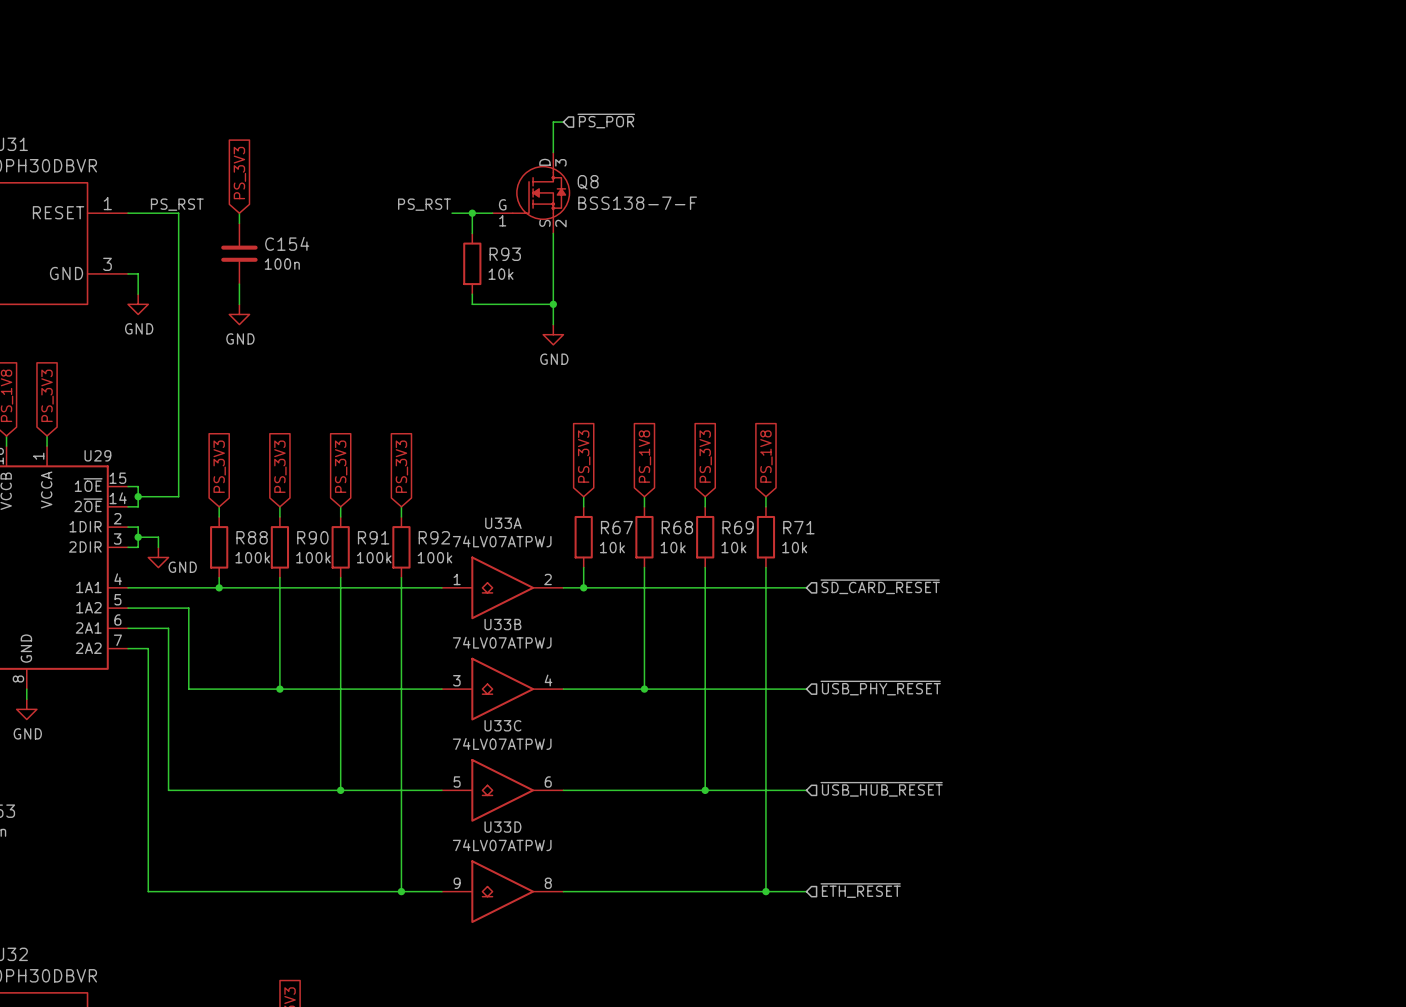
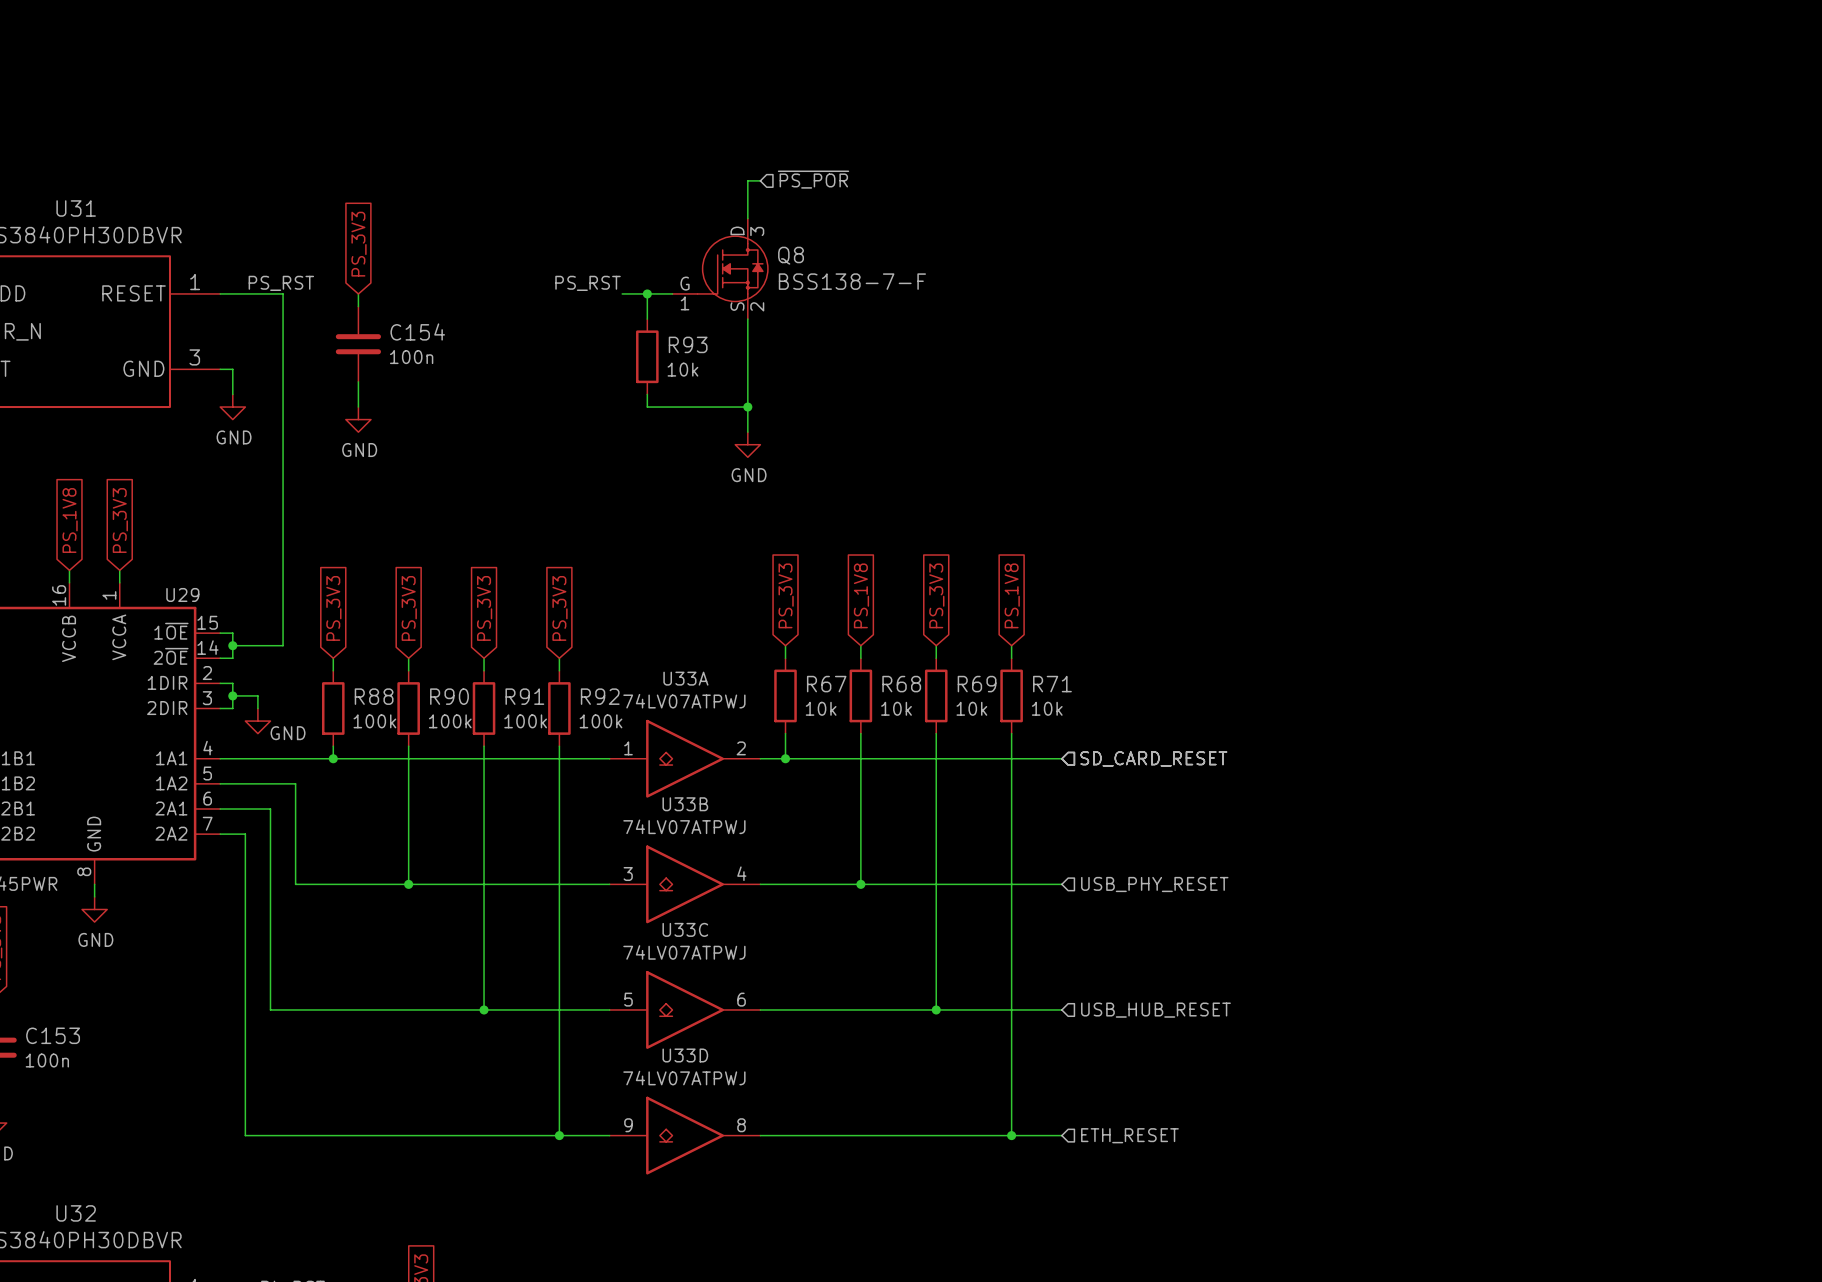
hierarchical label: ~{SD_CARD_RESET} (880, 586) -> SD_CARD_RESET (1153, 758)
hierarchical label: ~{USB_PHY_RESET} (880, 688) -> USB_PHY_RESET (1154, 884)
hierarchical label: ~{USB_HUB_RESET} (881, 789) -> USB_HUB_RESET (1155, 1010)
hierarchical label: ~{ETH_RESET} (860, 890) -> ETH_RESET (1129, 1135)

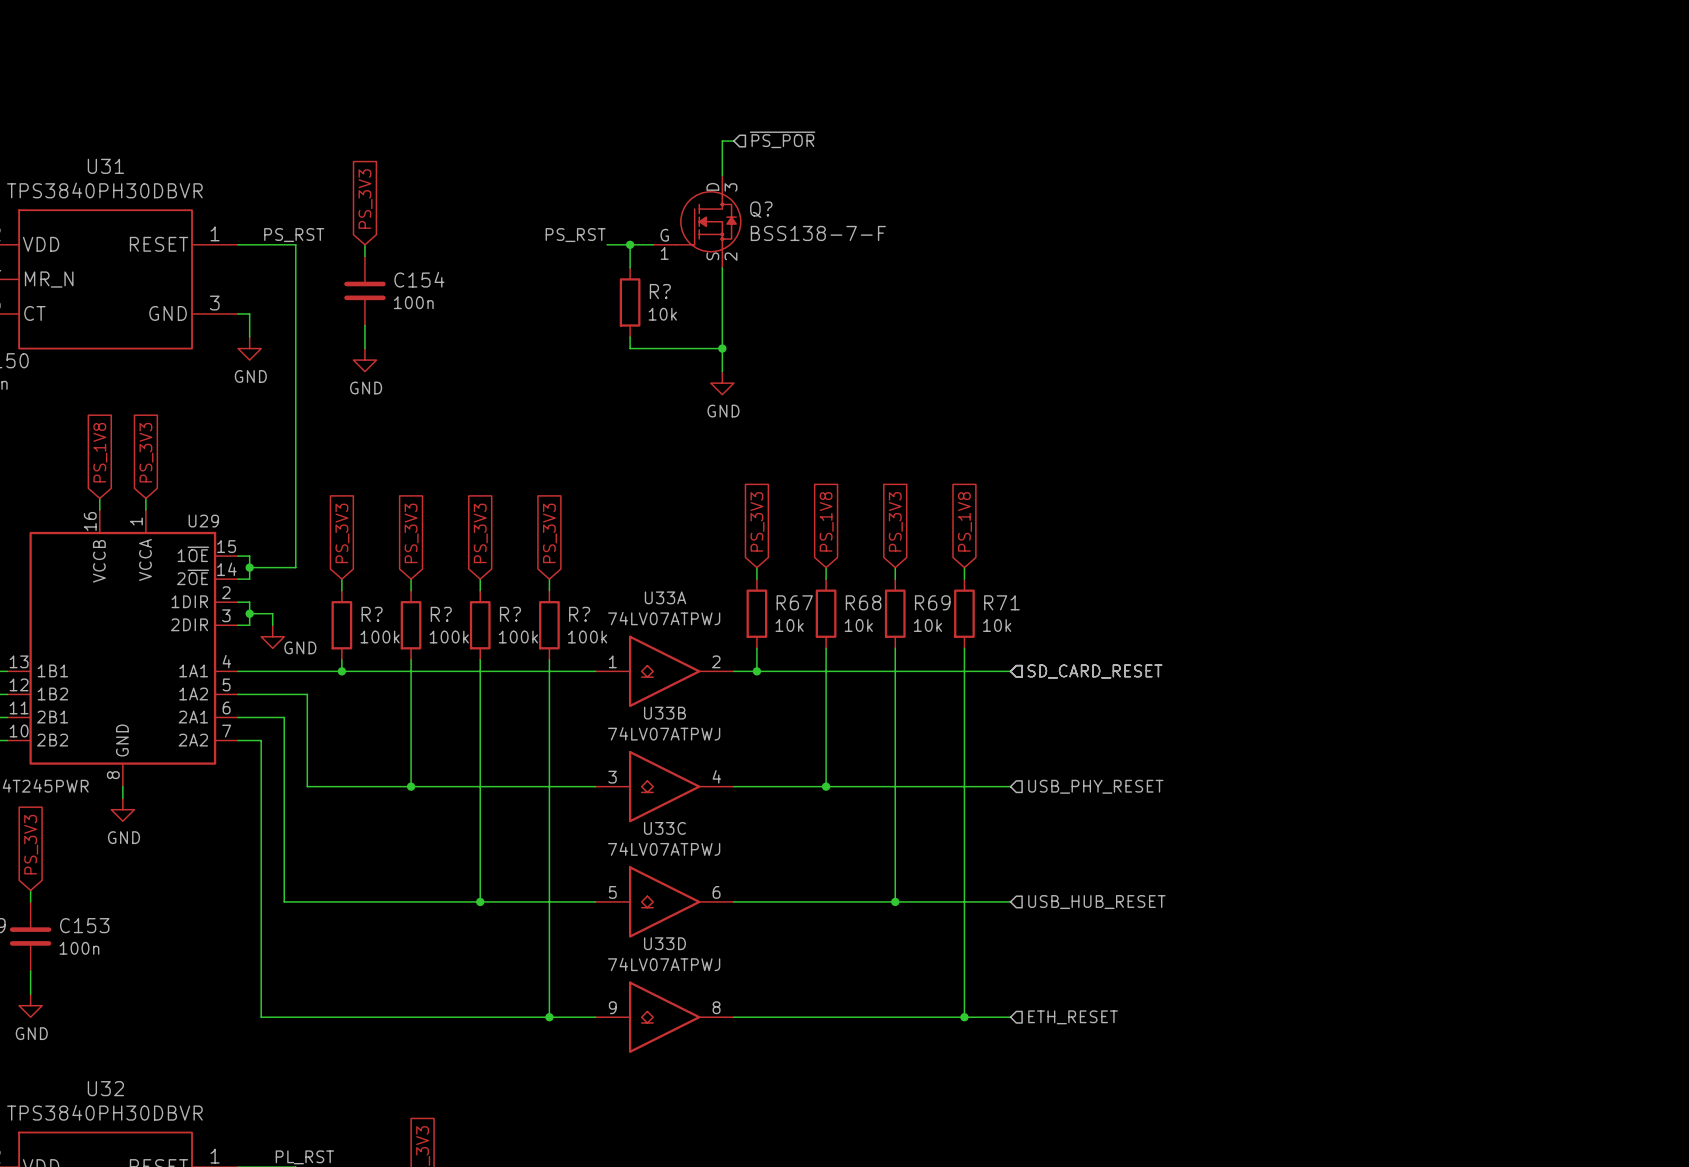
Q8 name: Q8 (791, 255) -> Q? (761, 209)
R93 name: R93 (688, 344) -> R? (660, 291)
R88 name: R88 (374, 696) -> R? (372, 614)
R90 name: R90 (449, 696) -> R? (441, 614)
R91 name: R91 (524, 696) -> R? (510, 614)
R92 name: R92 (600, 696) -> R? (579, 614)

